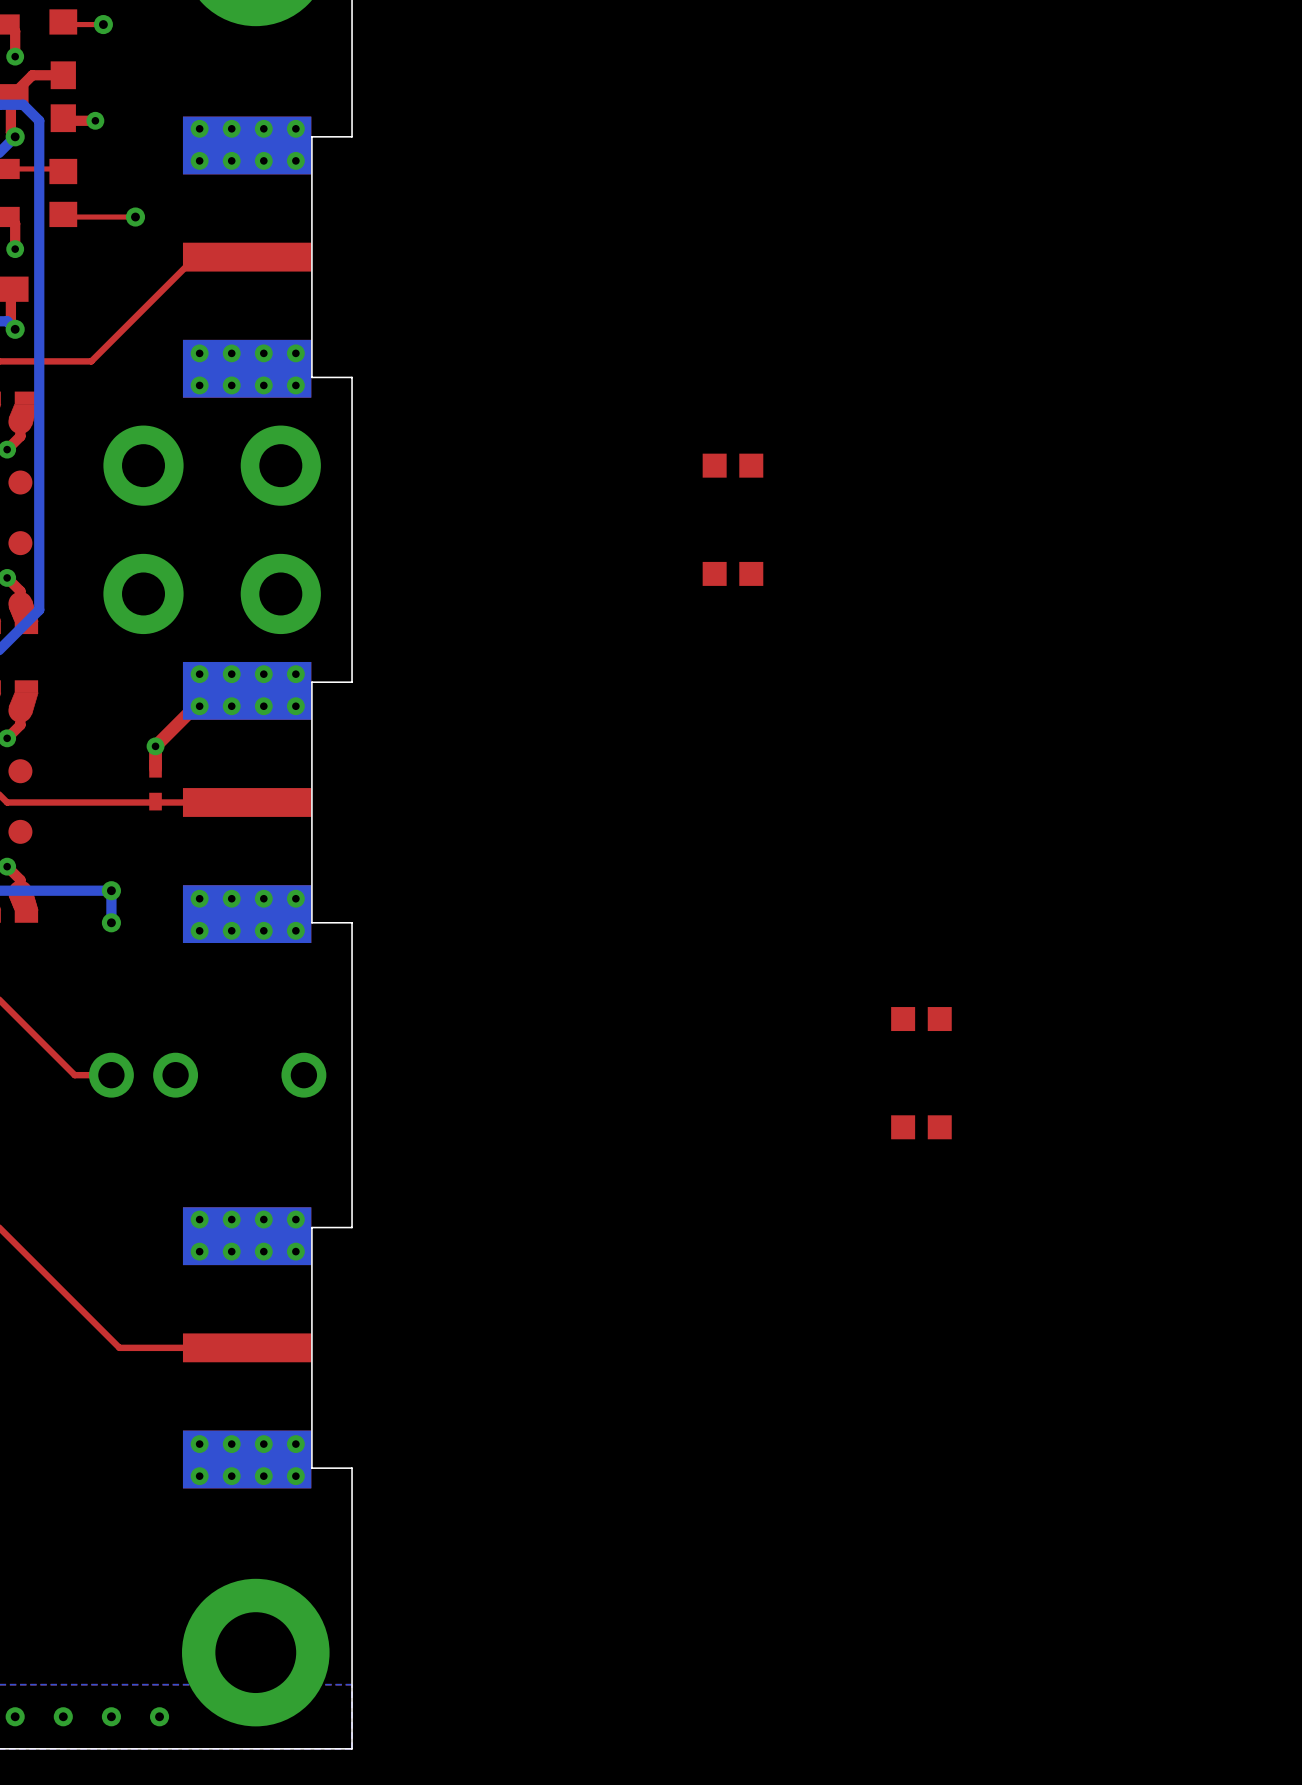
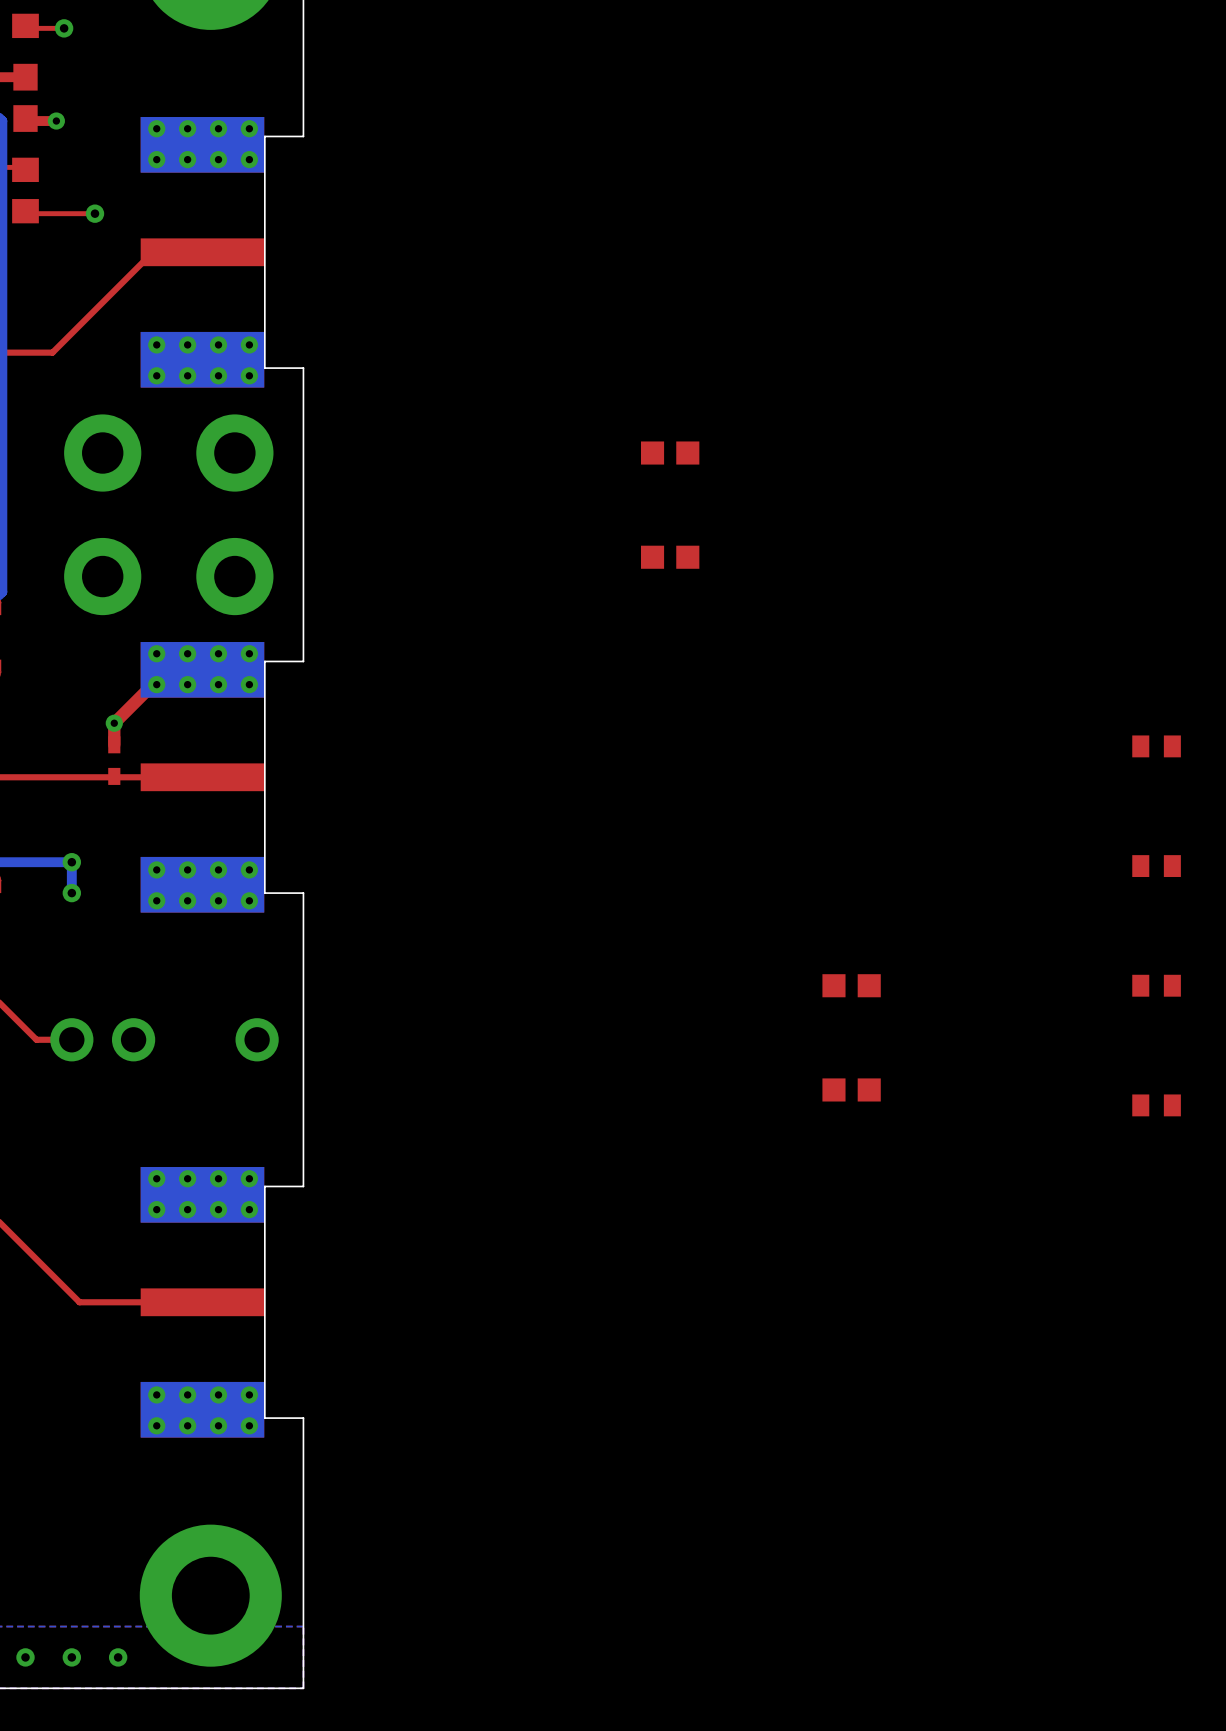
part: none -> (1156, 746)
part: none -> (1156, 866)
part: none -> (1156, 985)
part: none -> (1156, 1105)

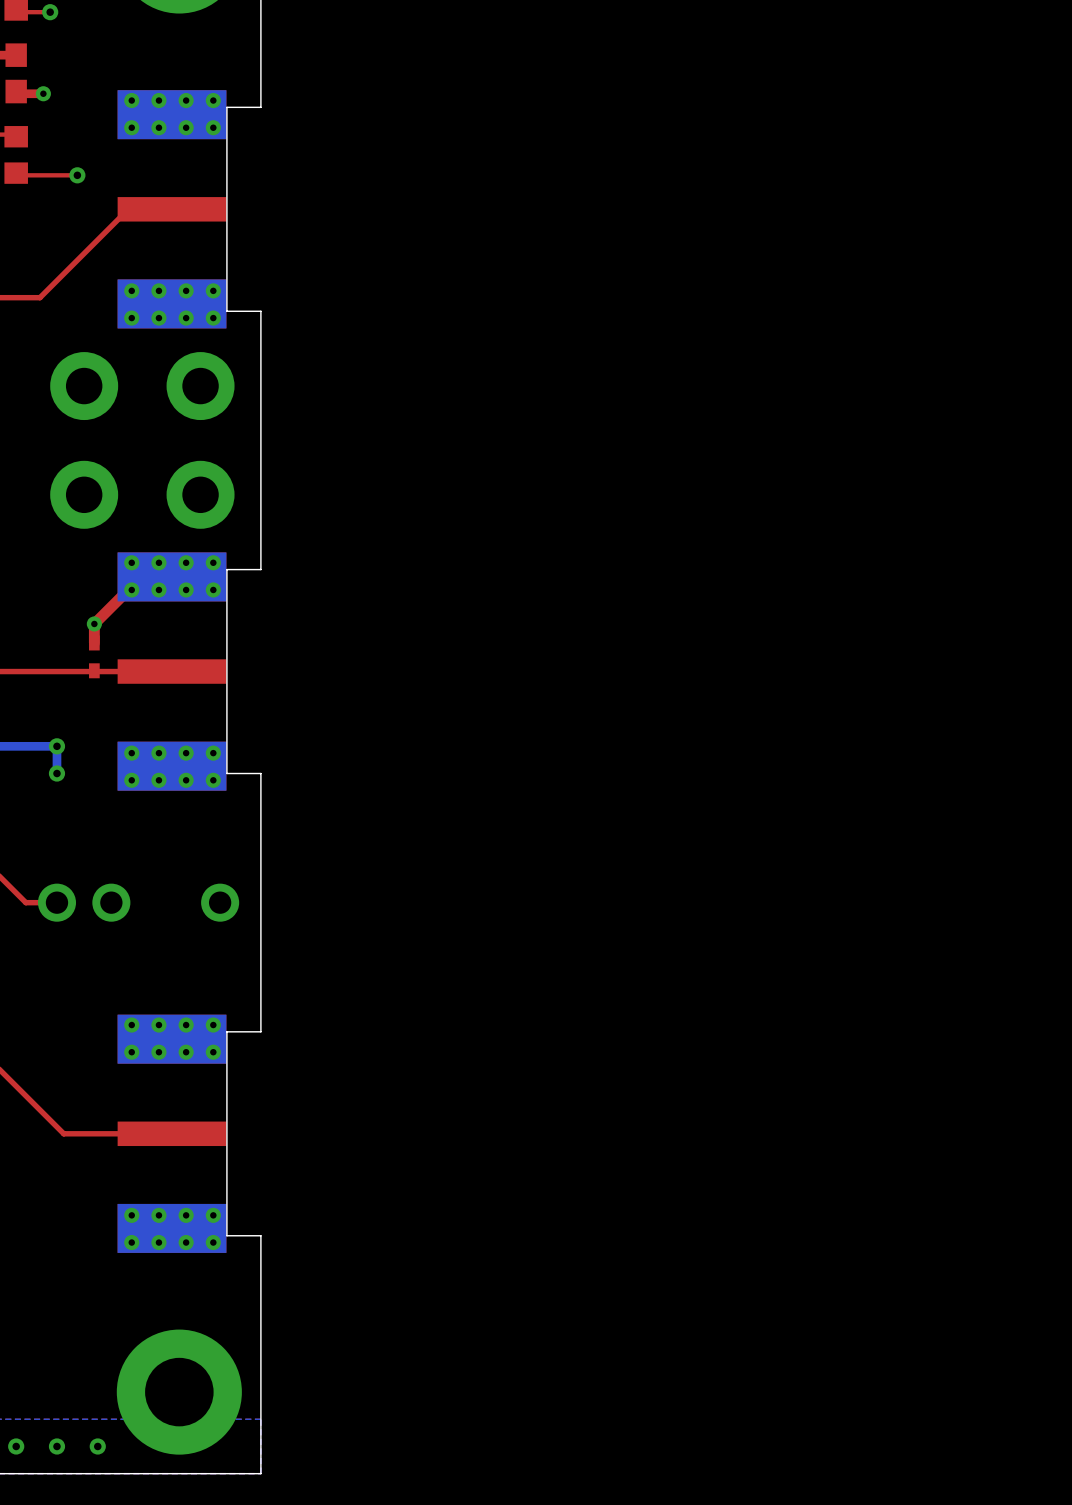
part: (670, 453) -> none
part: (670, 557) -> none
part: (1156, 746) -> none
part: (1156, 866) -> none
part: (851, 985) -> none
part: (1156, 985) -> none
part: (851, 1089) -> none
part: (1156, 1105) -> none

